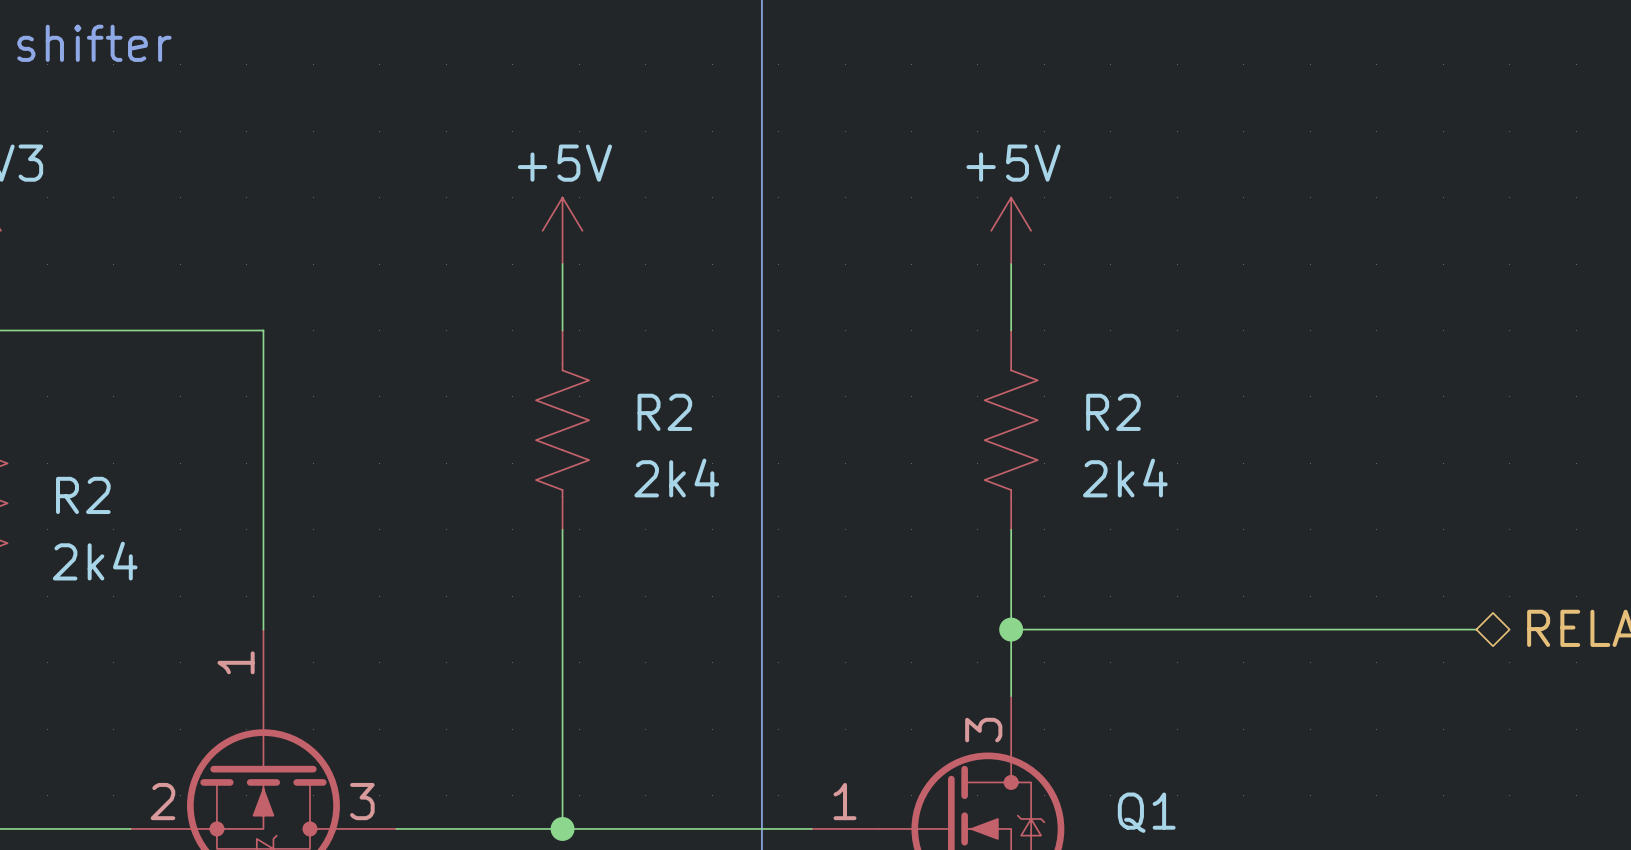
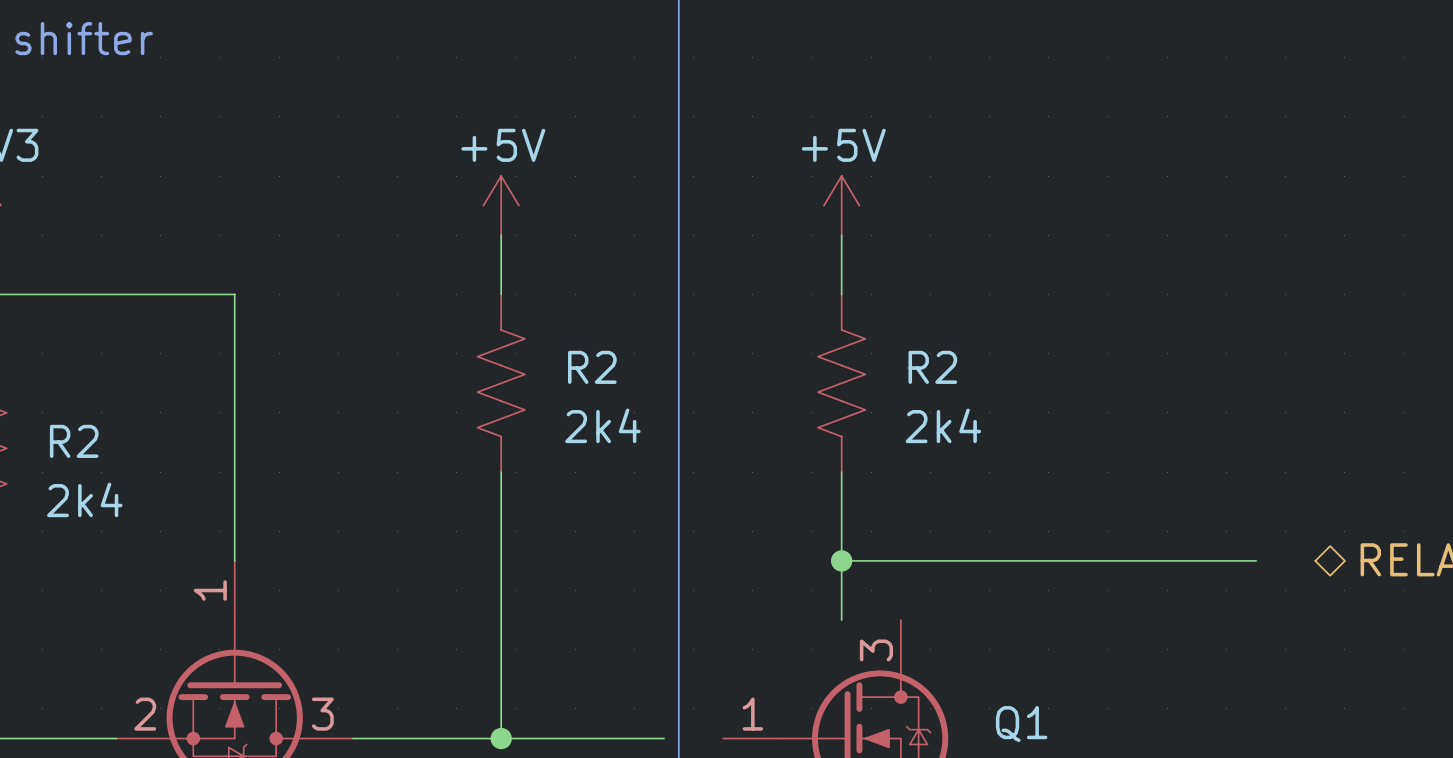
power symbol position: +5V (1011, 230) -> +5V (841, 205)
wire: (1011, 264) (1011, 330) -> (841, 235) (841, 294)
R2 position: (1011, 430) -> (841, 383)
wire: (1011, 529) (1011, 696) -> (841, 472) (841, 620)
junction position: (1011, 629) -> (841, 560)
wire: (1409, 629) (1476, 629) -> (841, 560) (900, 560)
wire: (745, 828) (811, 828) -> none

